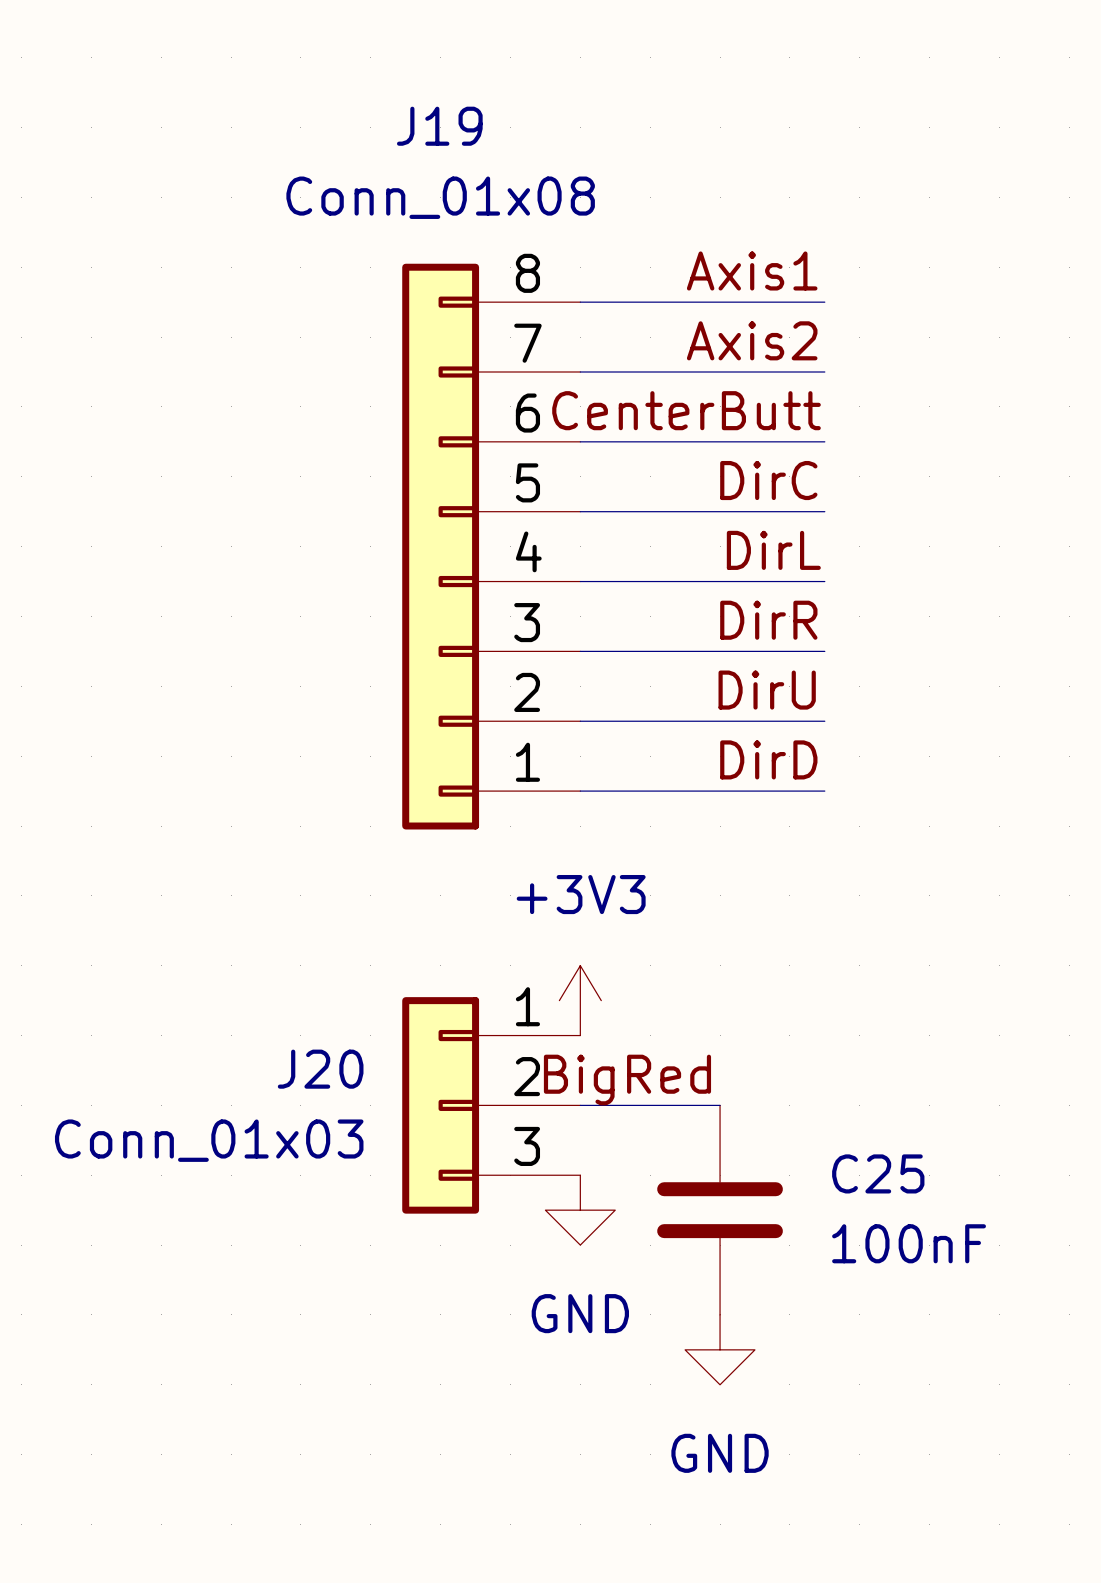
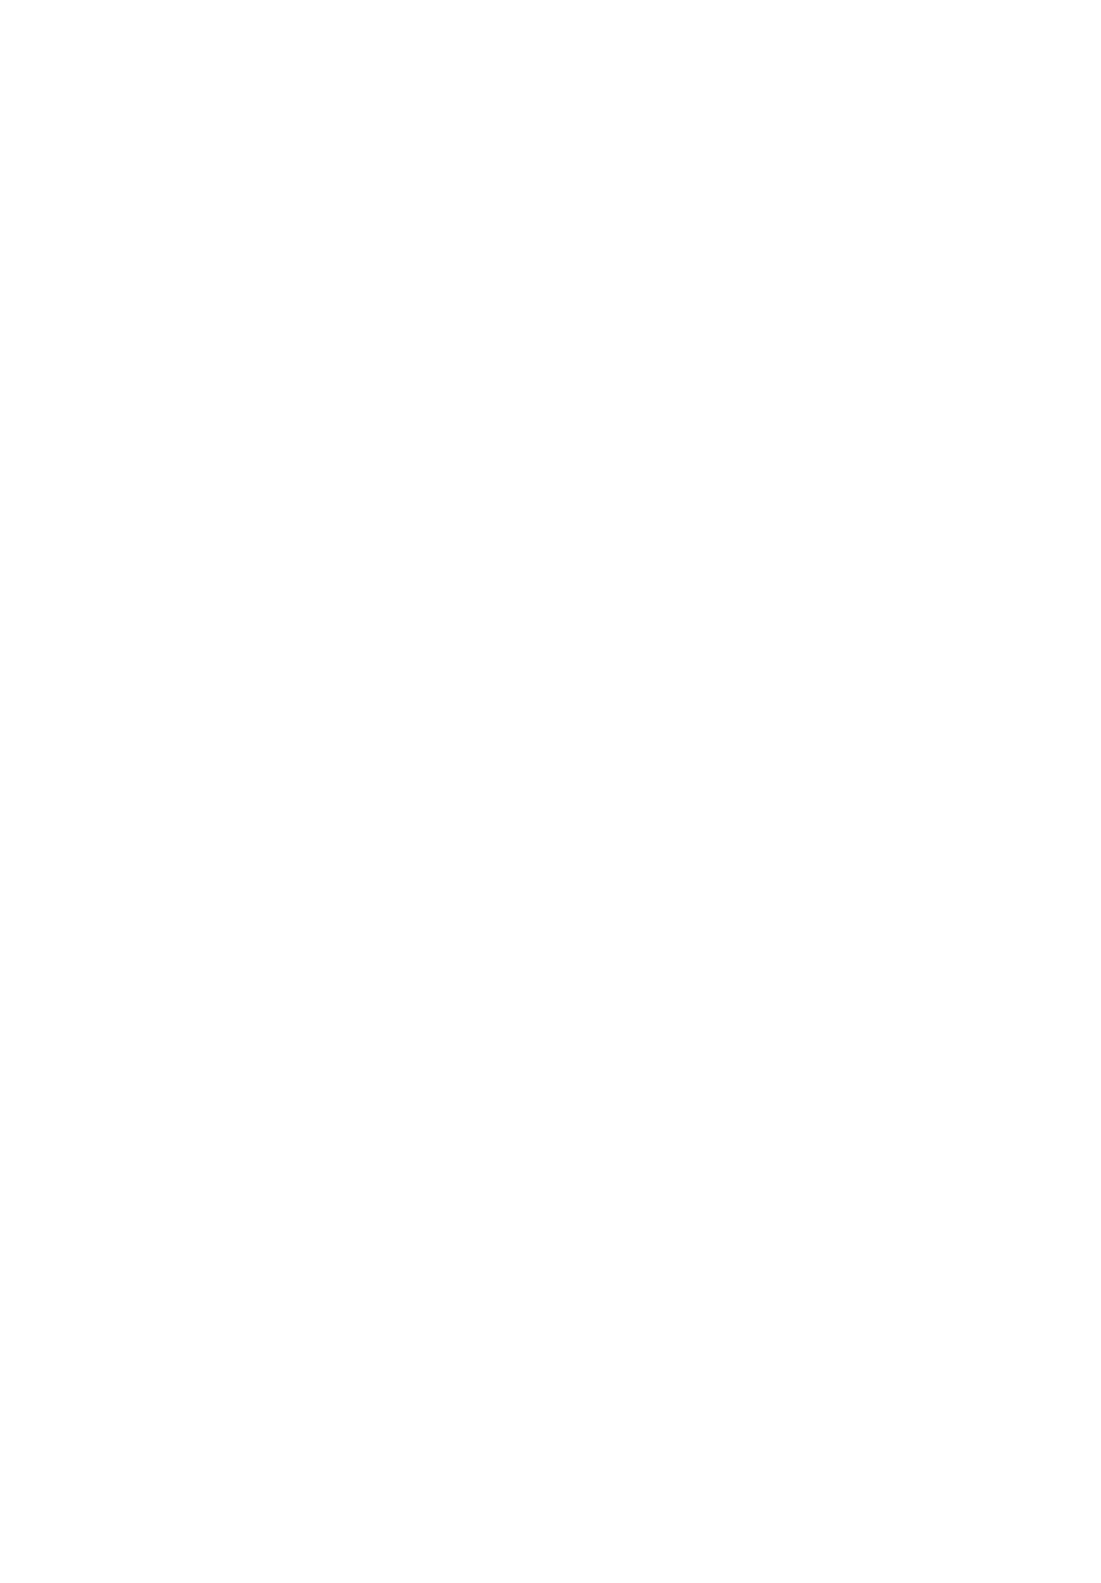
label: Axis1 (752, 270) -> none
wire: (580, 302) (824, 302) -> none
label: Axis2 (752, 340) -> none
wire: (580, 372) (824, 372) -> none
label: CenterButt (686, 410) -> none
wire: (580, 441) (824, 441) -> none
label: DirC (768, 480) -> none
wire: (580, 511) (824, 511) -> none
J19: Conn_01x08 (491, 546) -> none
label: DirL (773, 550) -> none
wire: (580, 581) (824, 581) -> none
label: DirR (768, 620) -> none
wire: (580, 651) (824, 651) -> none
label: DirU (767, 690) -> none
wire: (580, 721) (824, 721) -> none
label: DirD (768, 759) -> none
wire: (580, 791) (824, 791) -> none
power symbol: +3V3 (580, 1000) -> none
label: BigRed (627, 1080) -> none
J20: Conn_01x03 (491, 1105) -> none
wire: (580, 1105) (720, 1105) -> none
power symbol: GND (580, 1210) -> none
C25: 100nF (720, 1210) -> none
power symbol: GND (720, 1349) -> none

